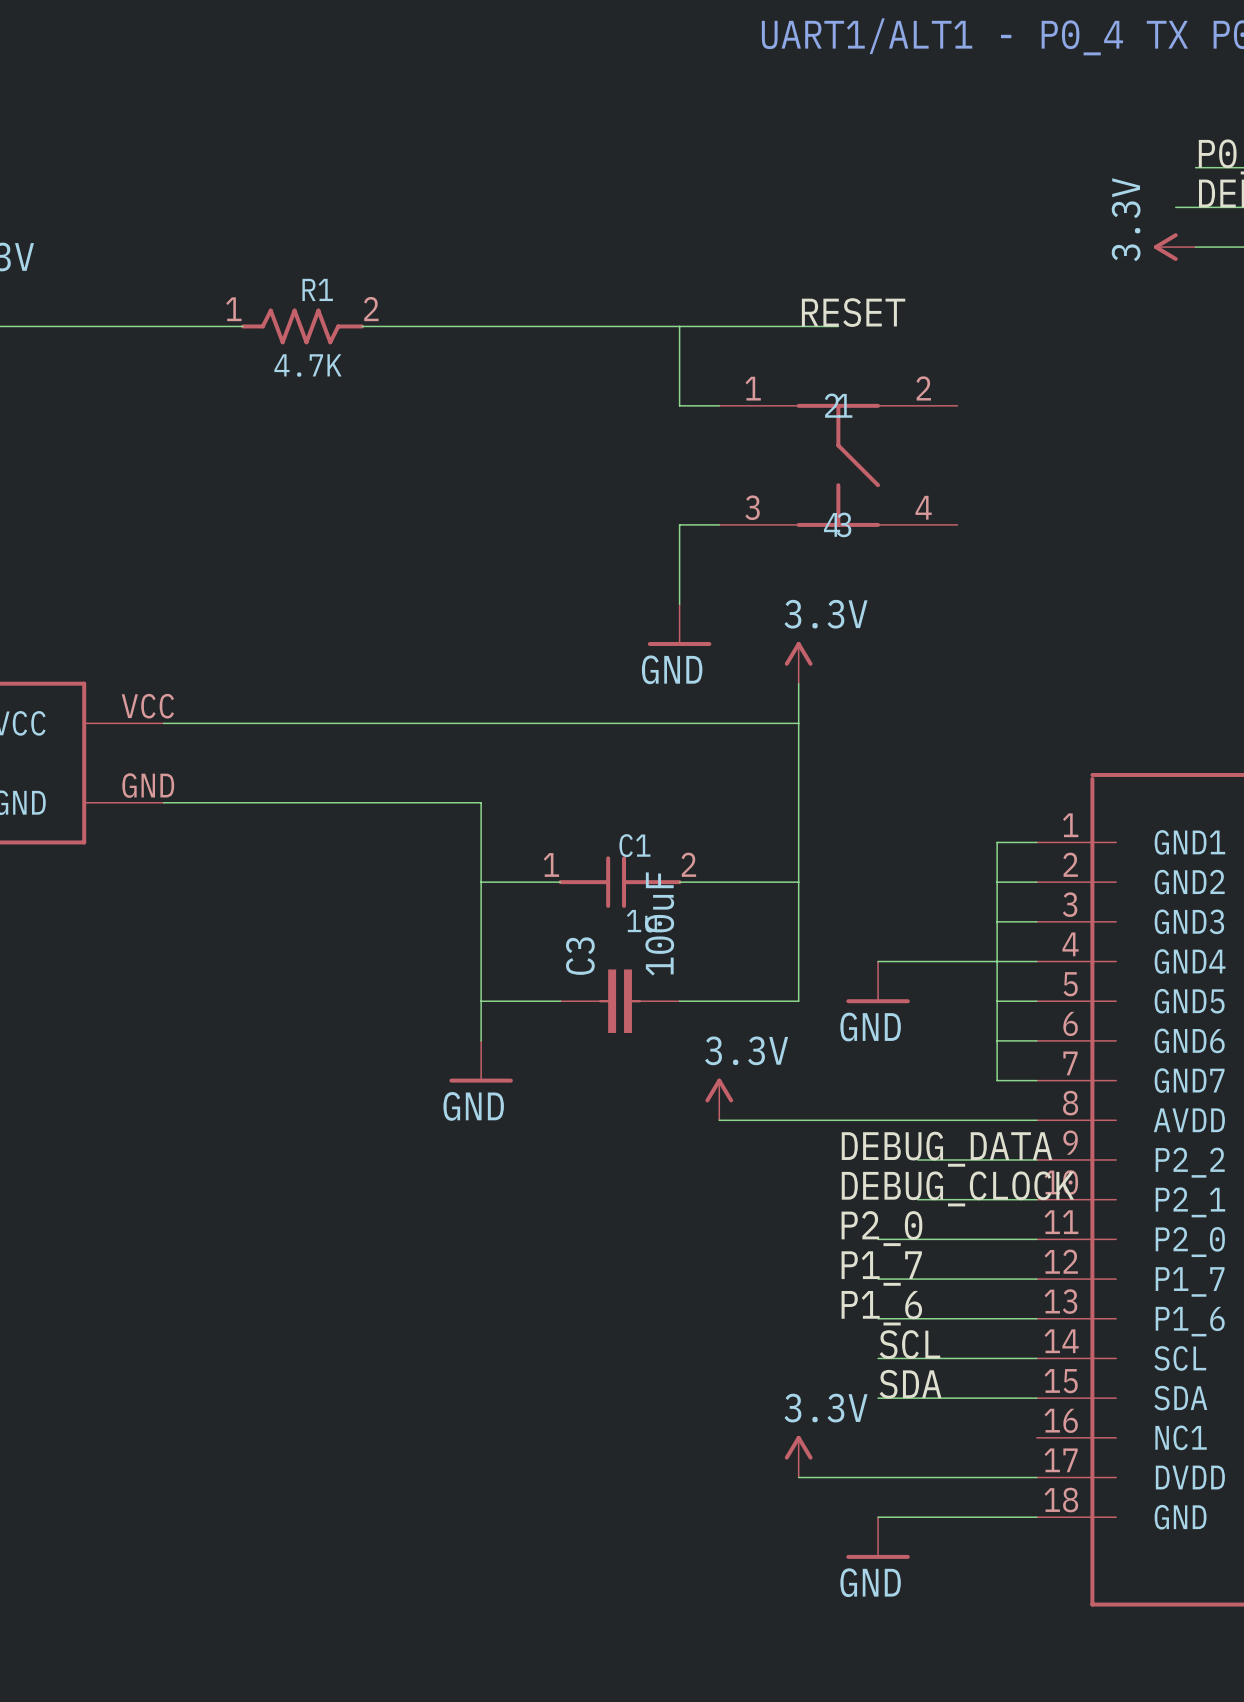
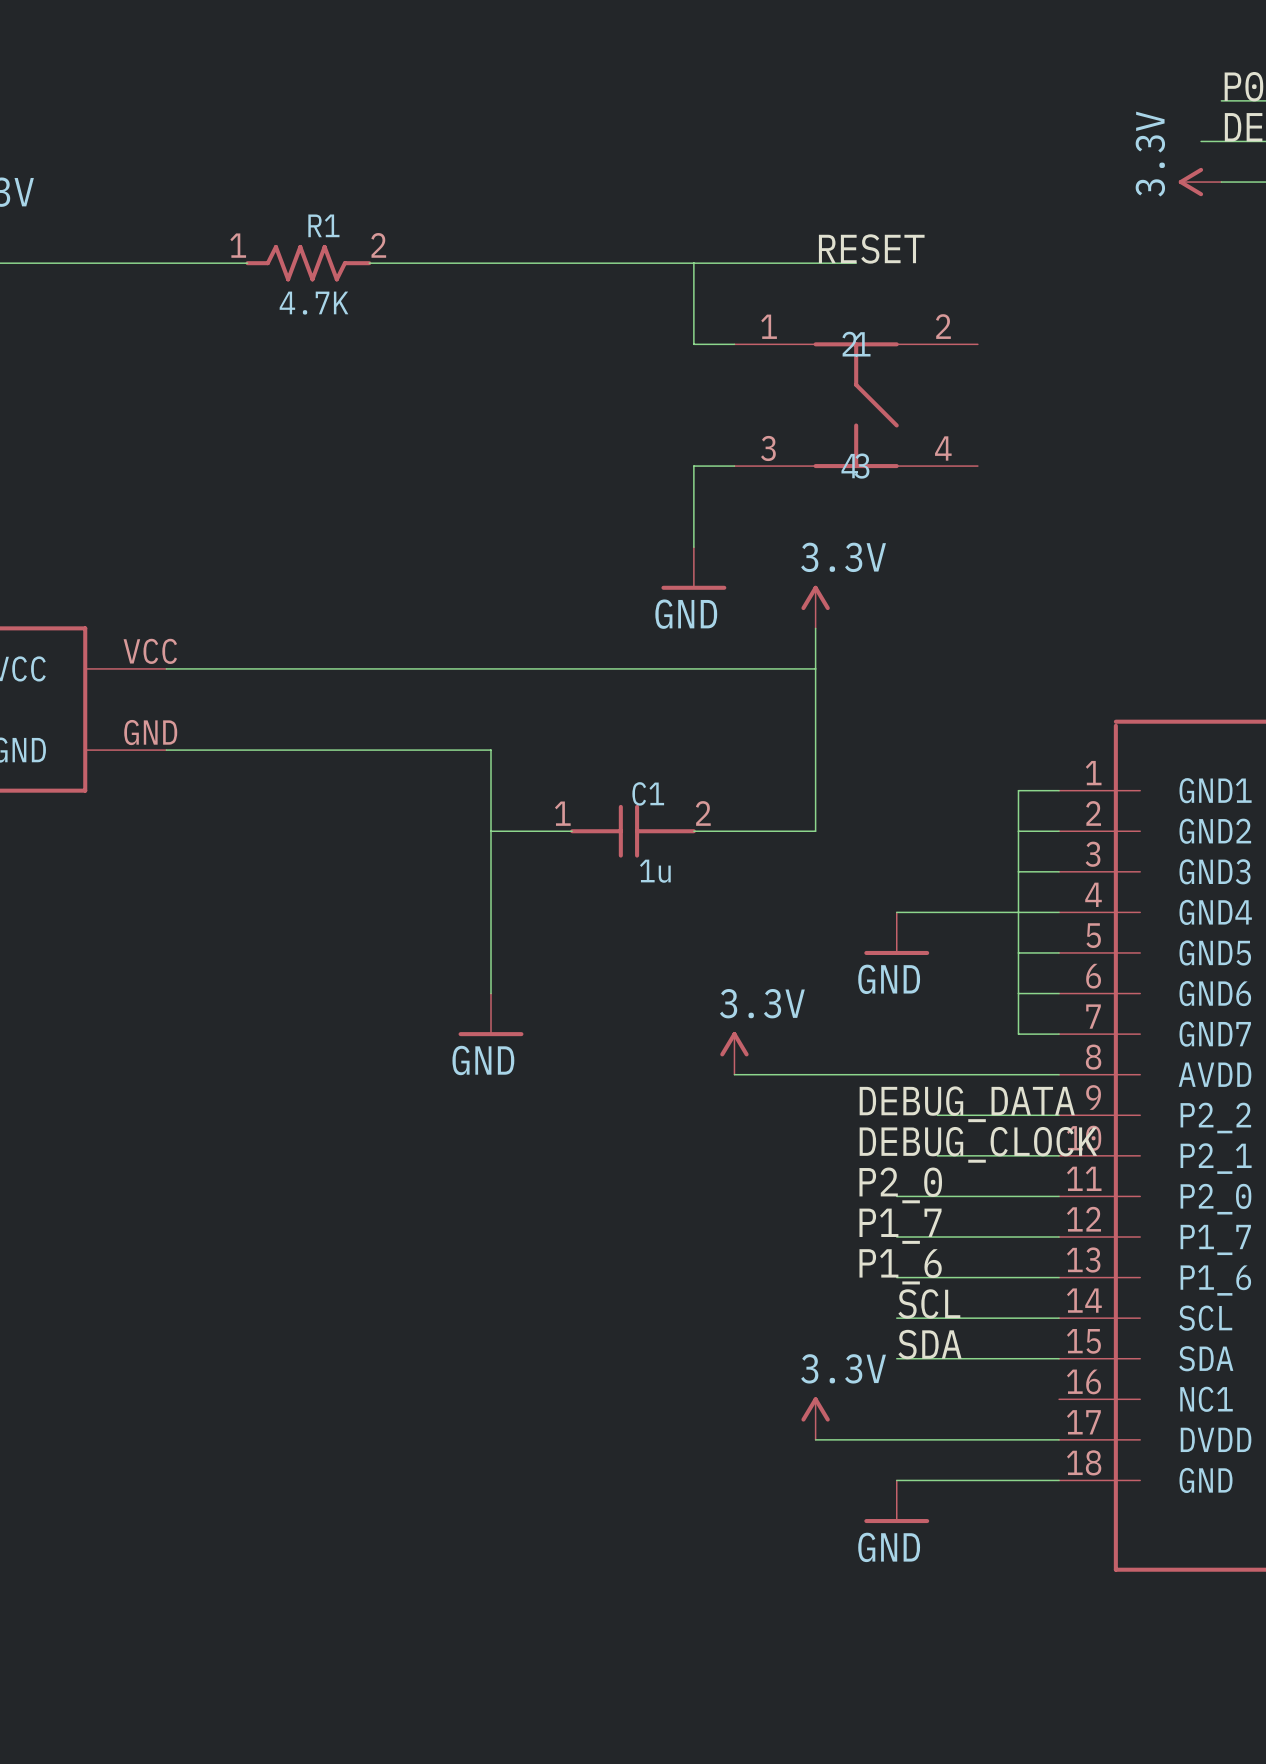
wire: (798, 882) (798, 1001) (679, 1001) -> none
wire: (481, 1001) (560, 1001) -> none
C3: 100uF (620, 1001) -> none

